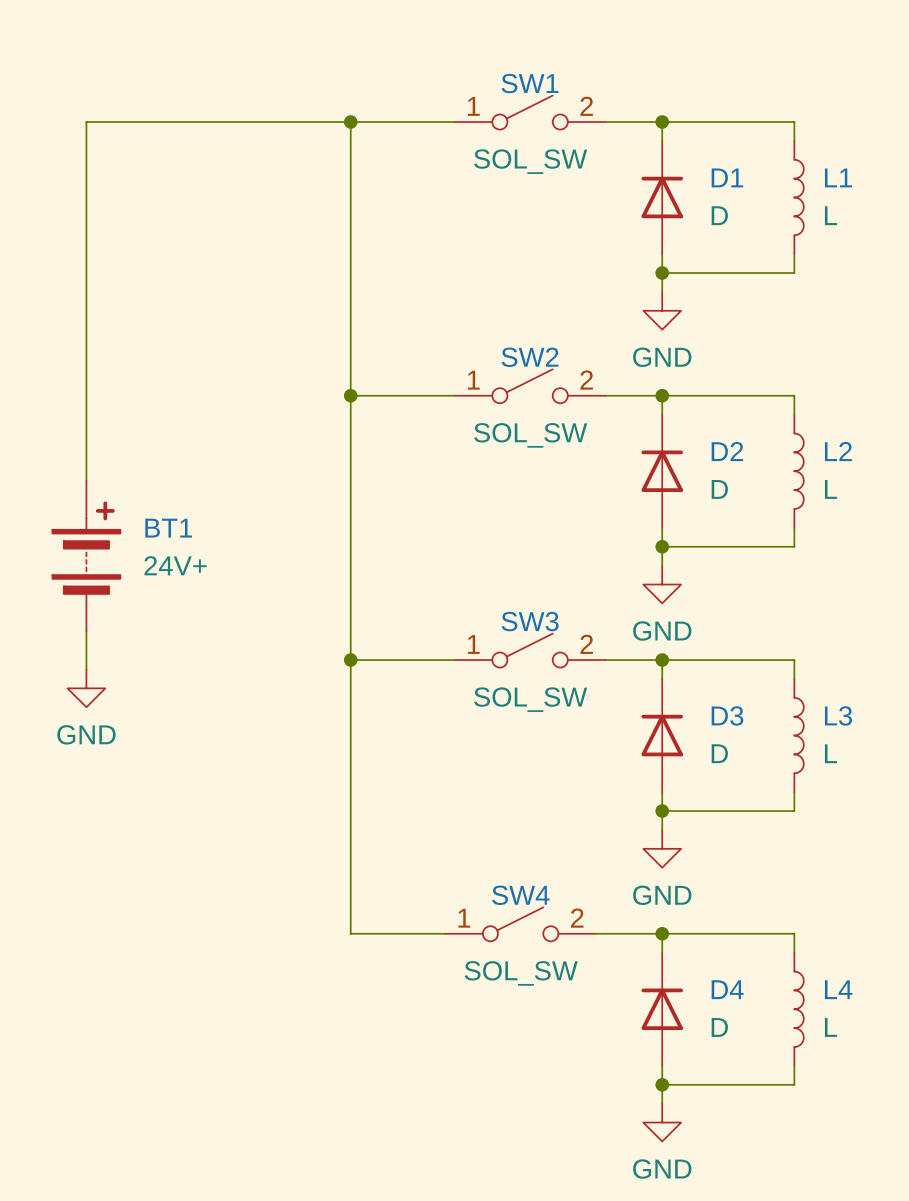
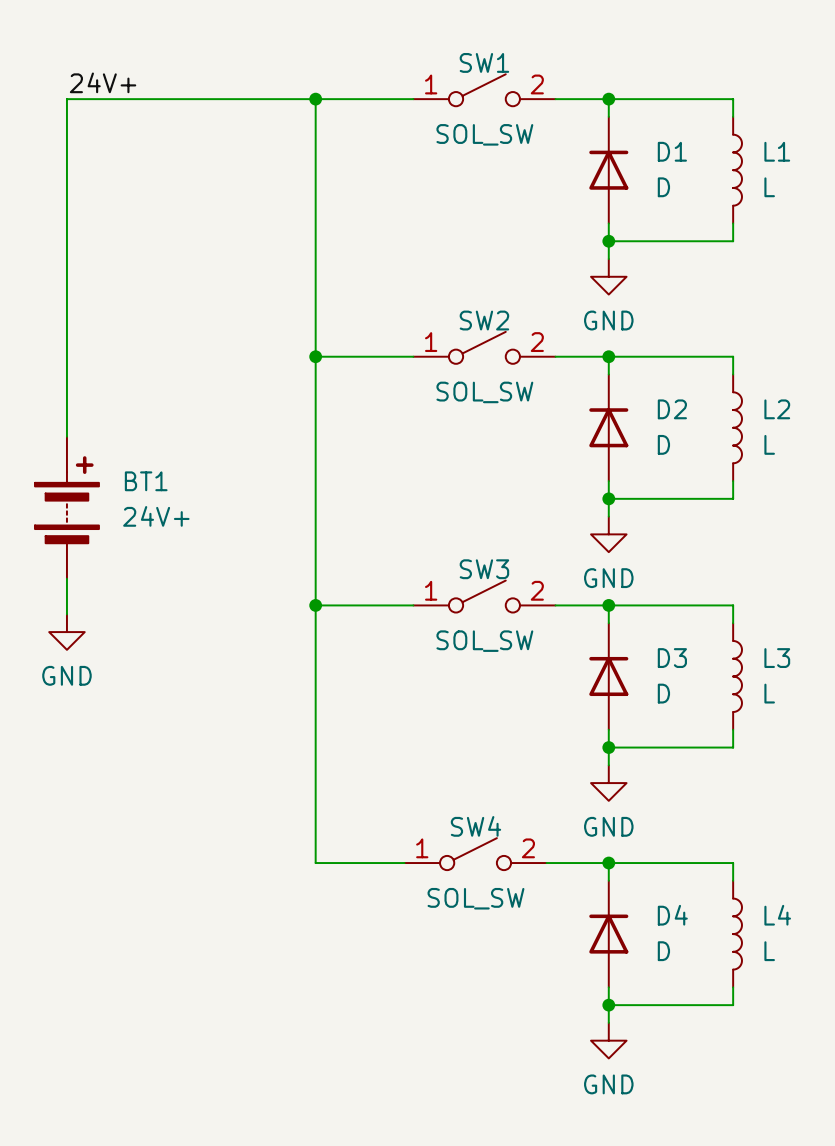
label: none -> 24V+ (103, 82)

